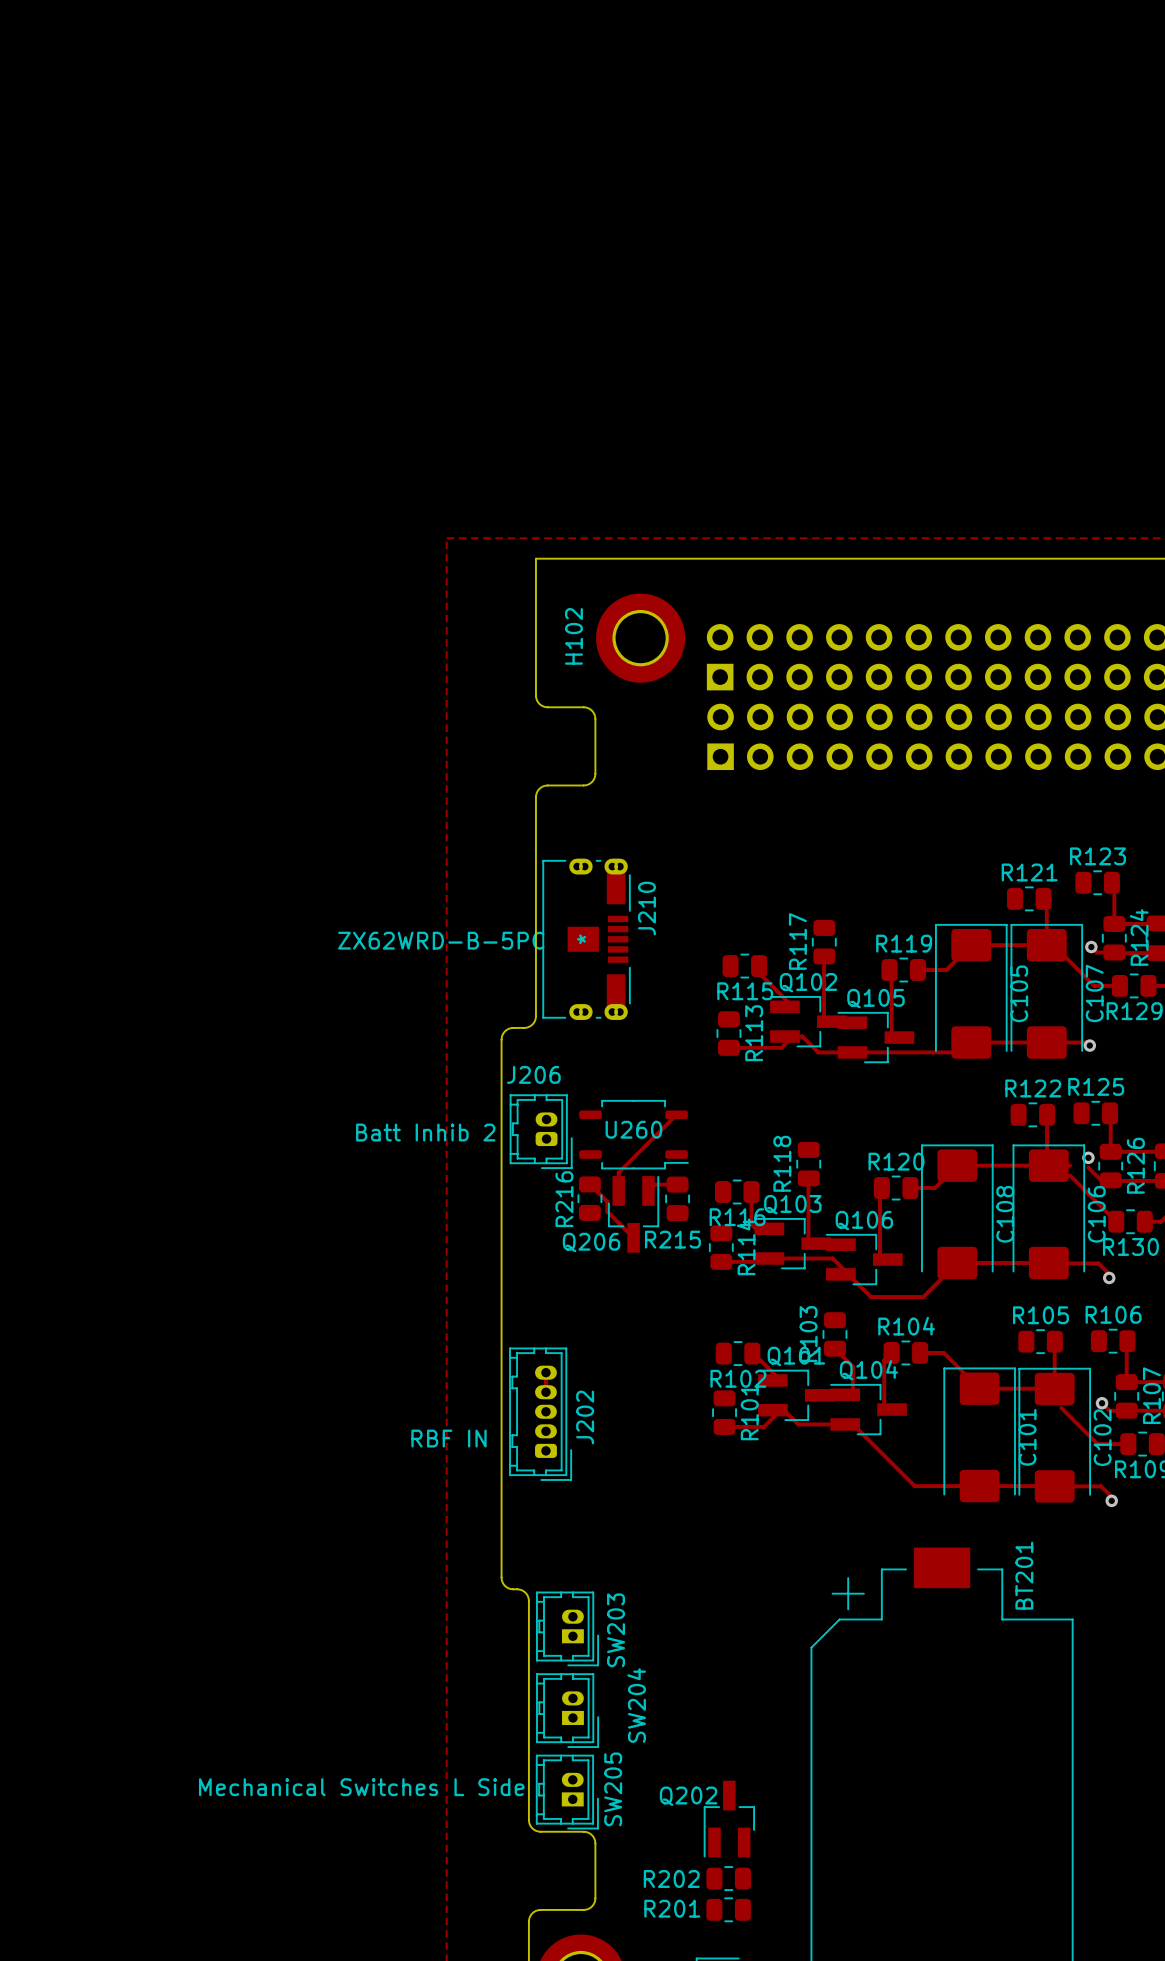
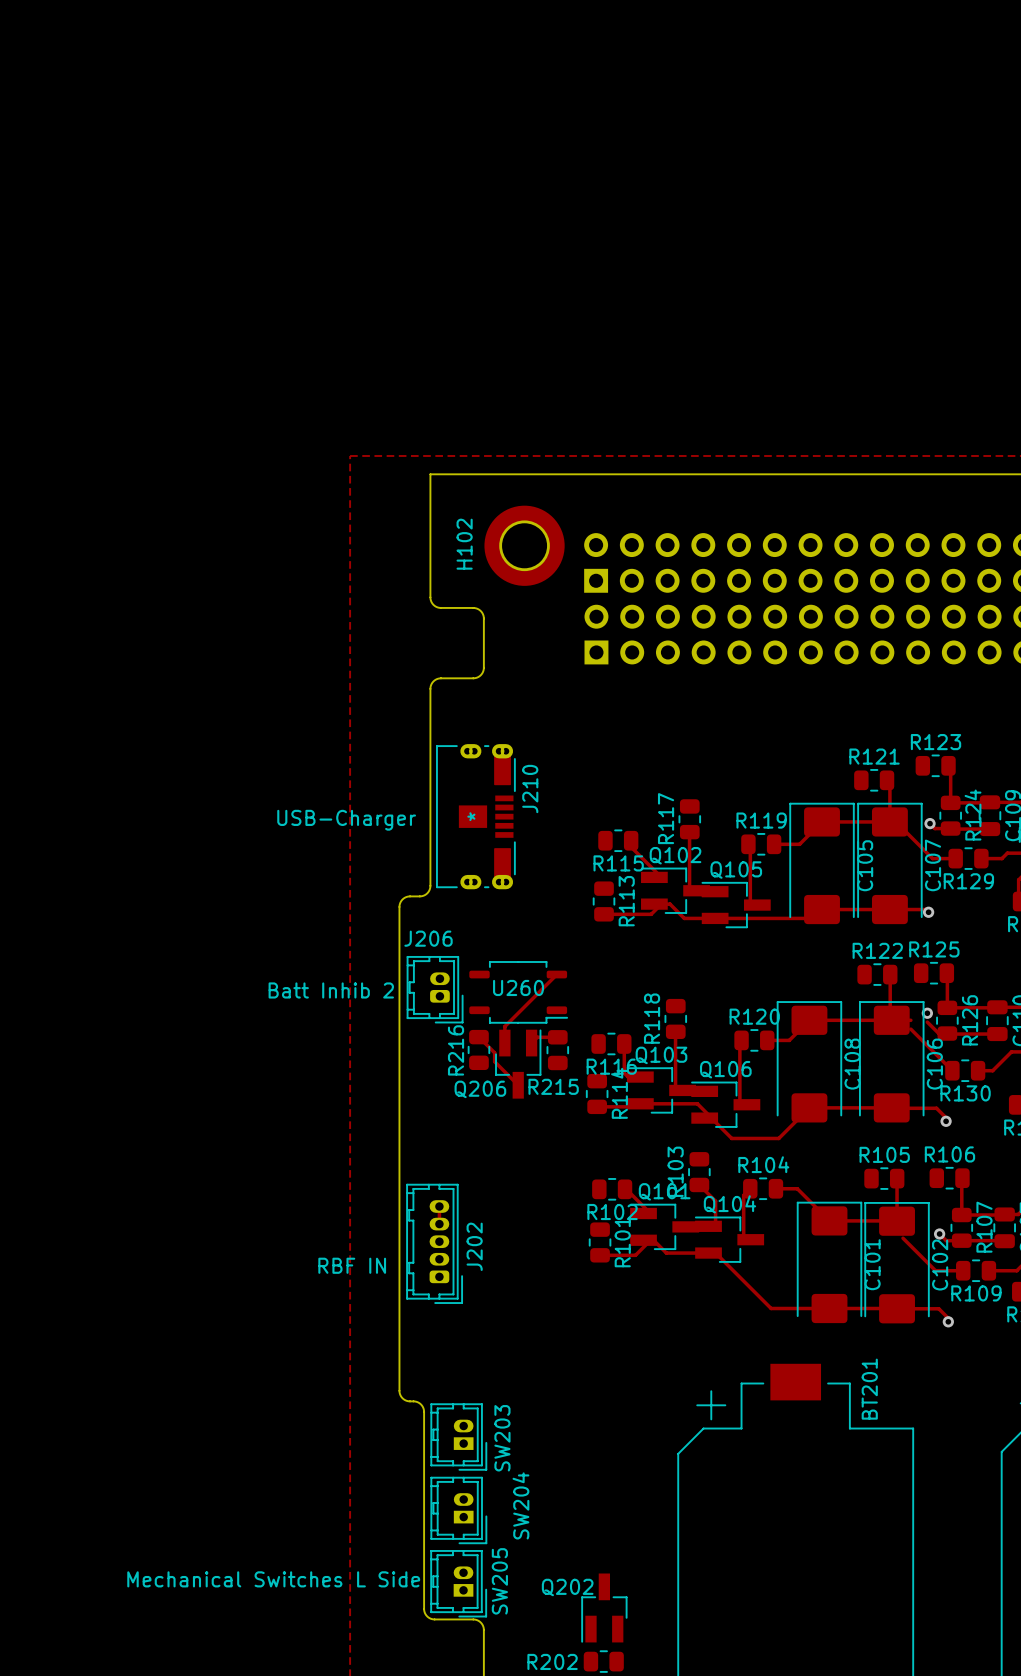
J210 value: ZX62WRD-B-5PC (441, 940) -> USB-Charger (346, 820)

